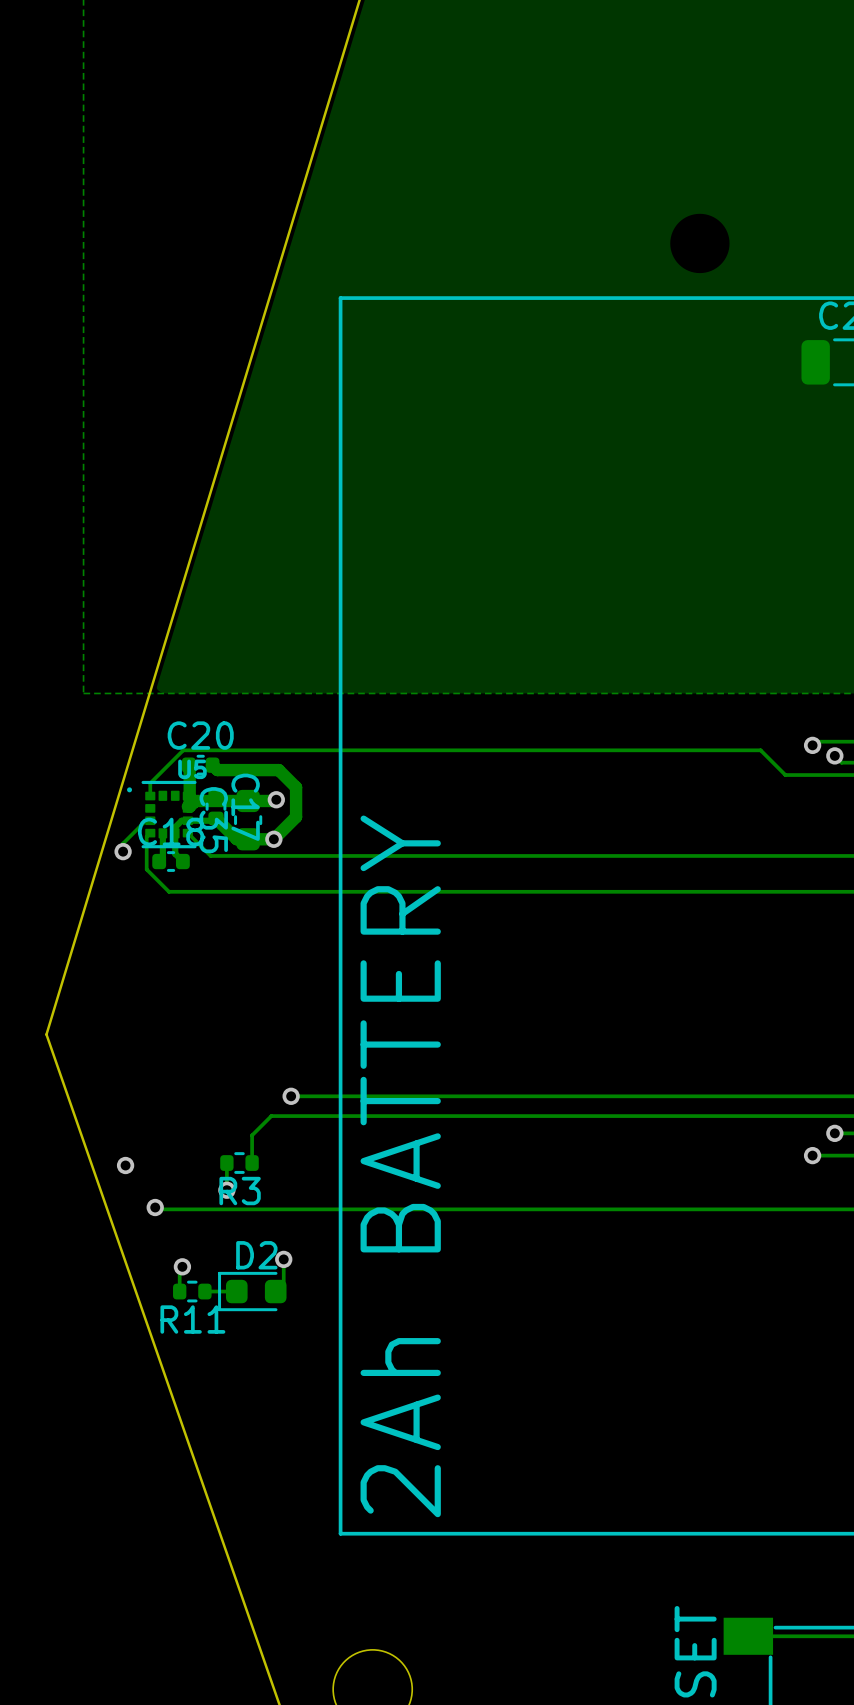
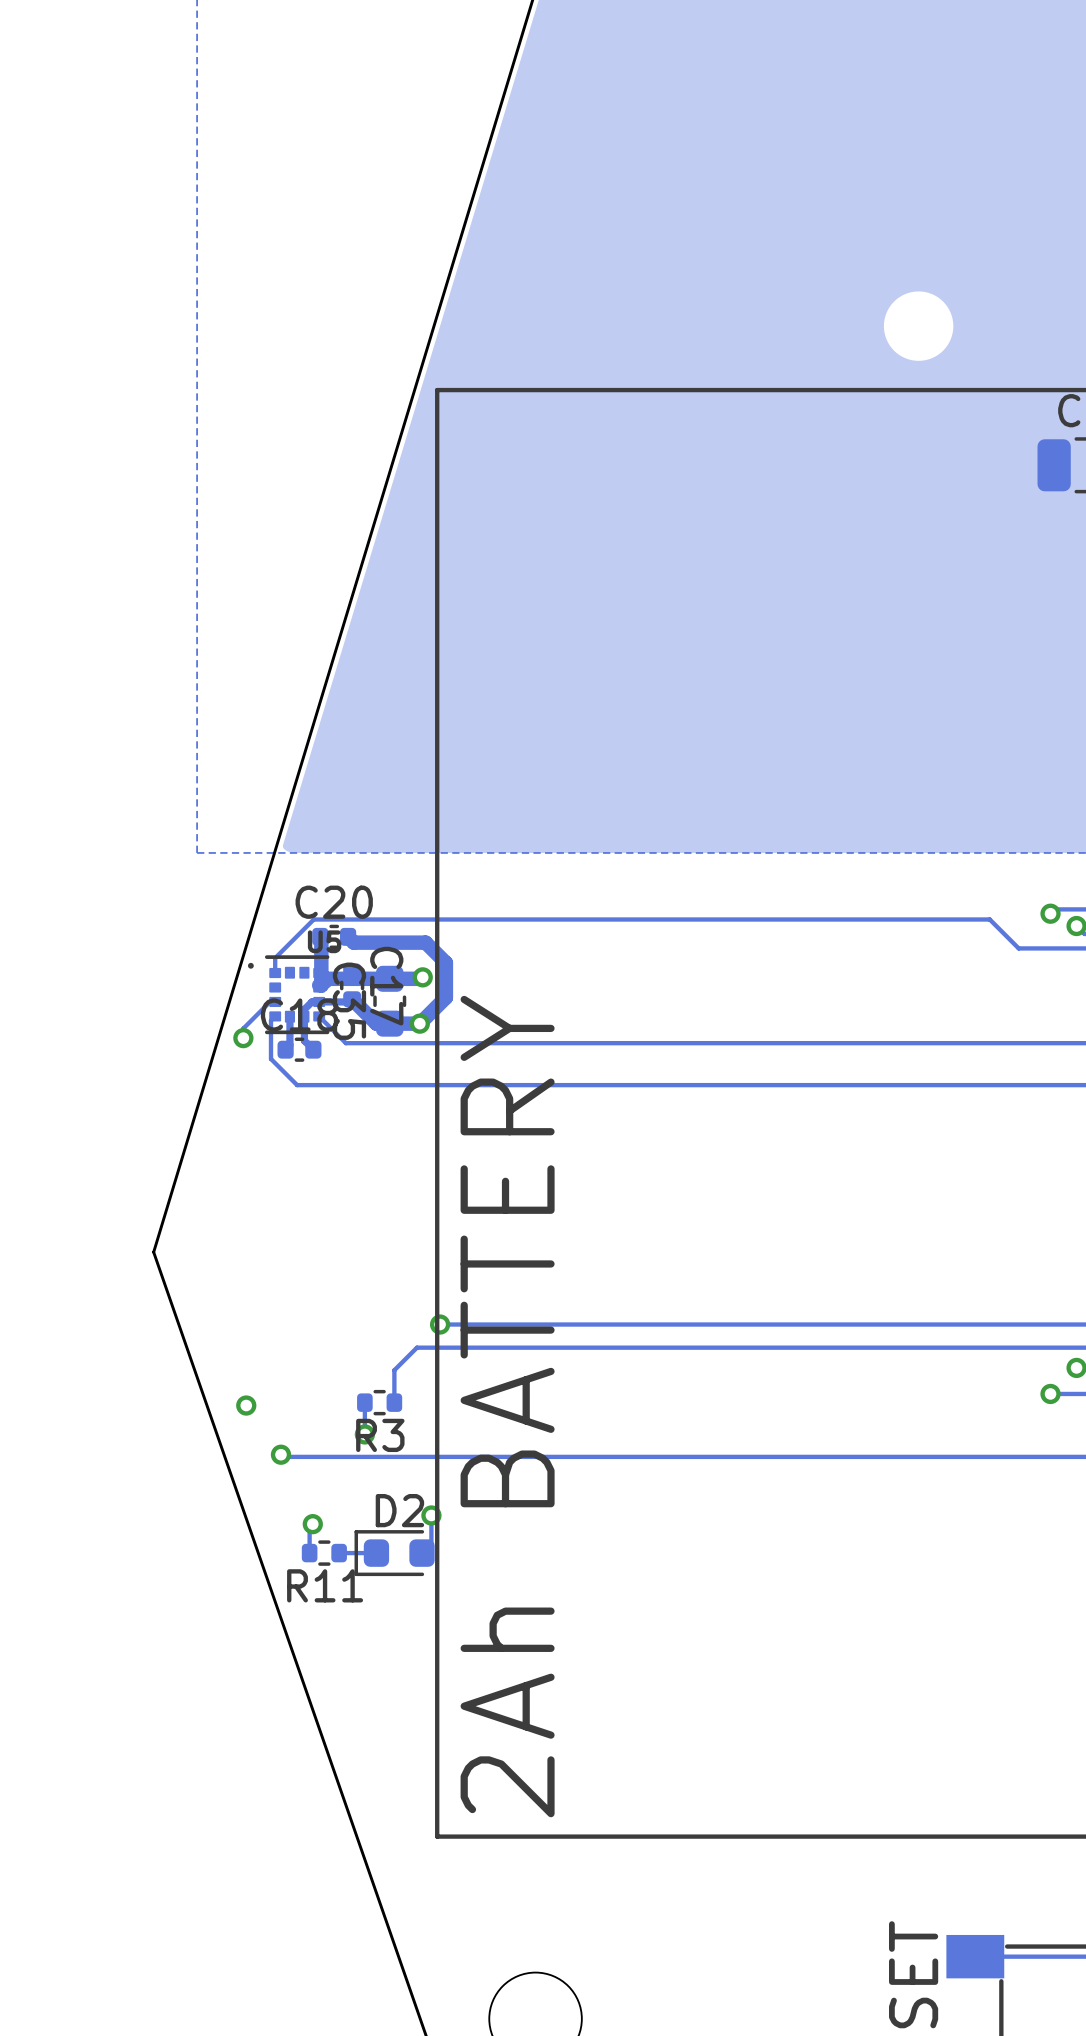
line: (340, 298) (340, 1533) -> (497, 390) (437, 390) (437, 1836) (497, 1836)
text position: 2Ah BATTERY (400, 1166) -> 2Ah BATTERY (507, 1406)

